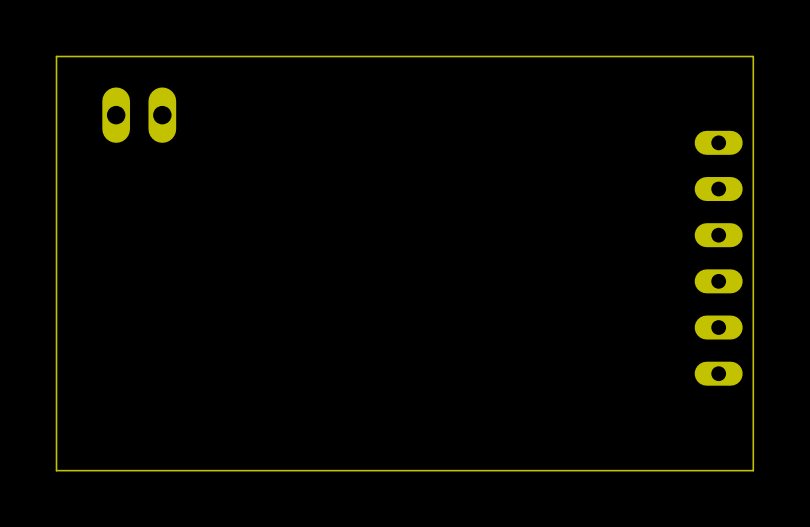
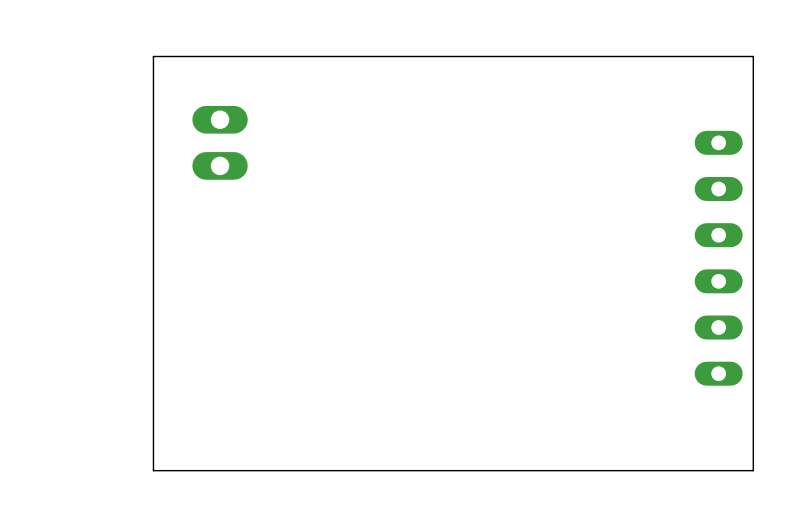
board edge: (153, 56) (56, 56) (56, 470) (153, 470) -> (153, 56) (153, 470)
part rotation: 0° (139, 115) -> 90° clockwise (220, 142)
part position: (139, 115) -> (220, 142)

